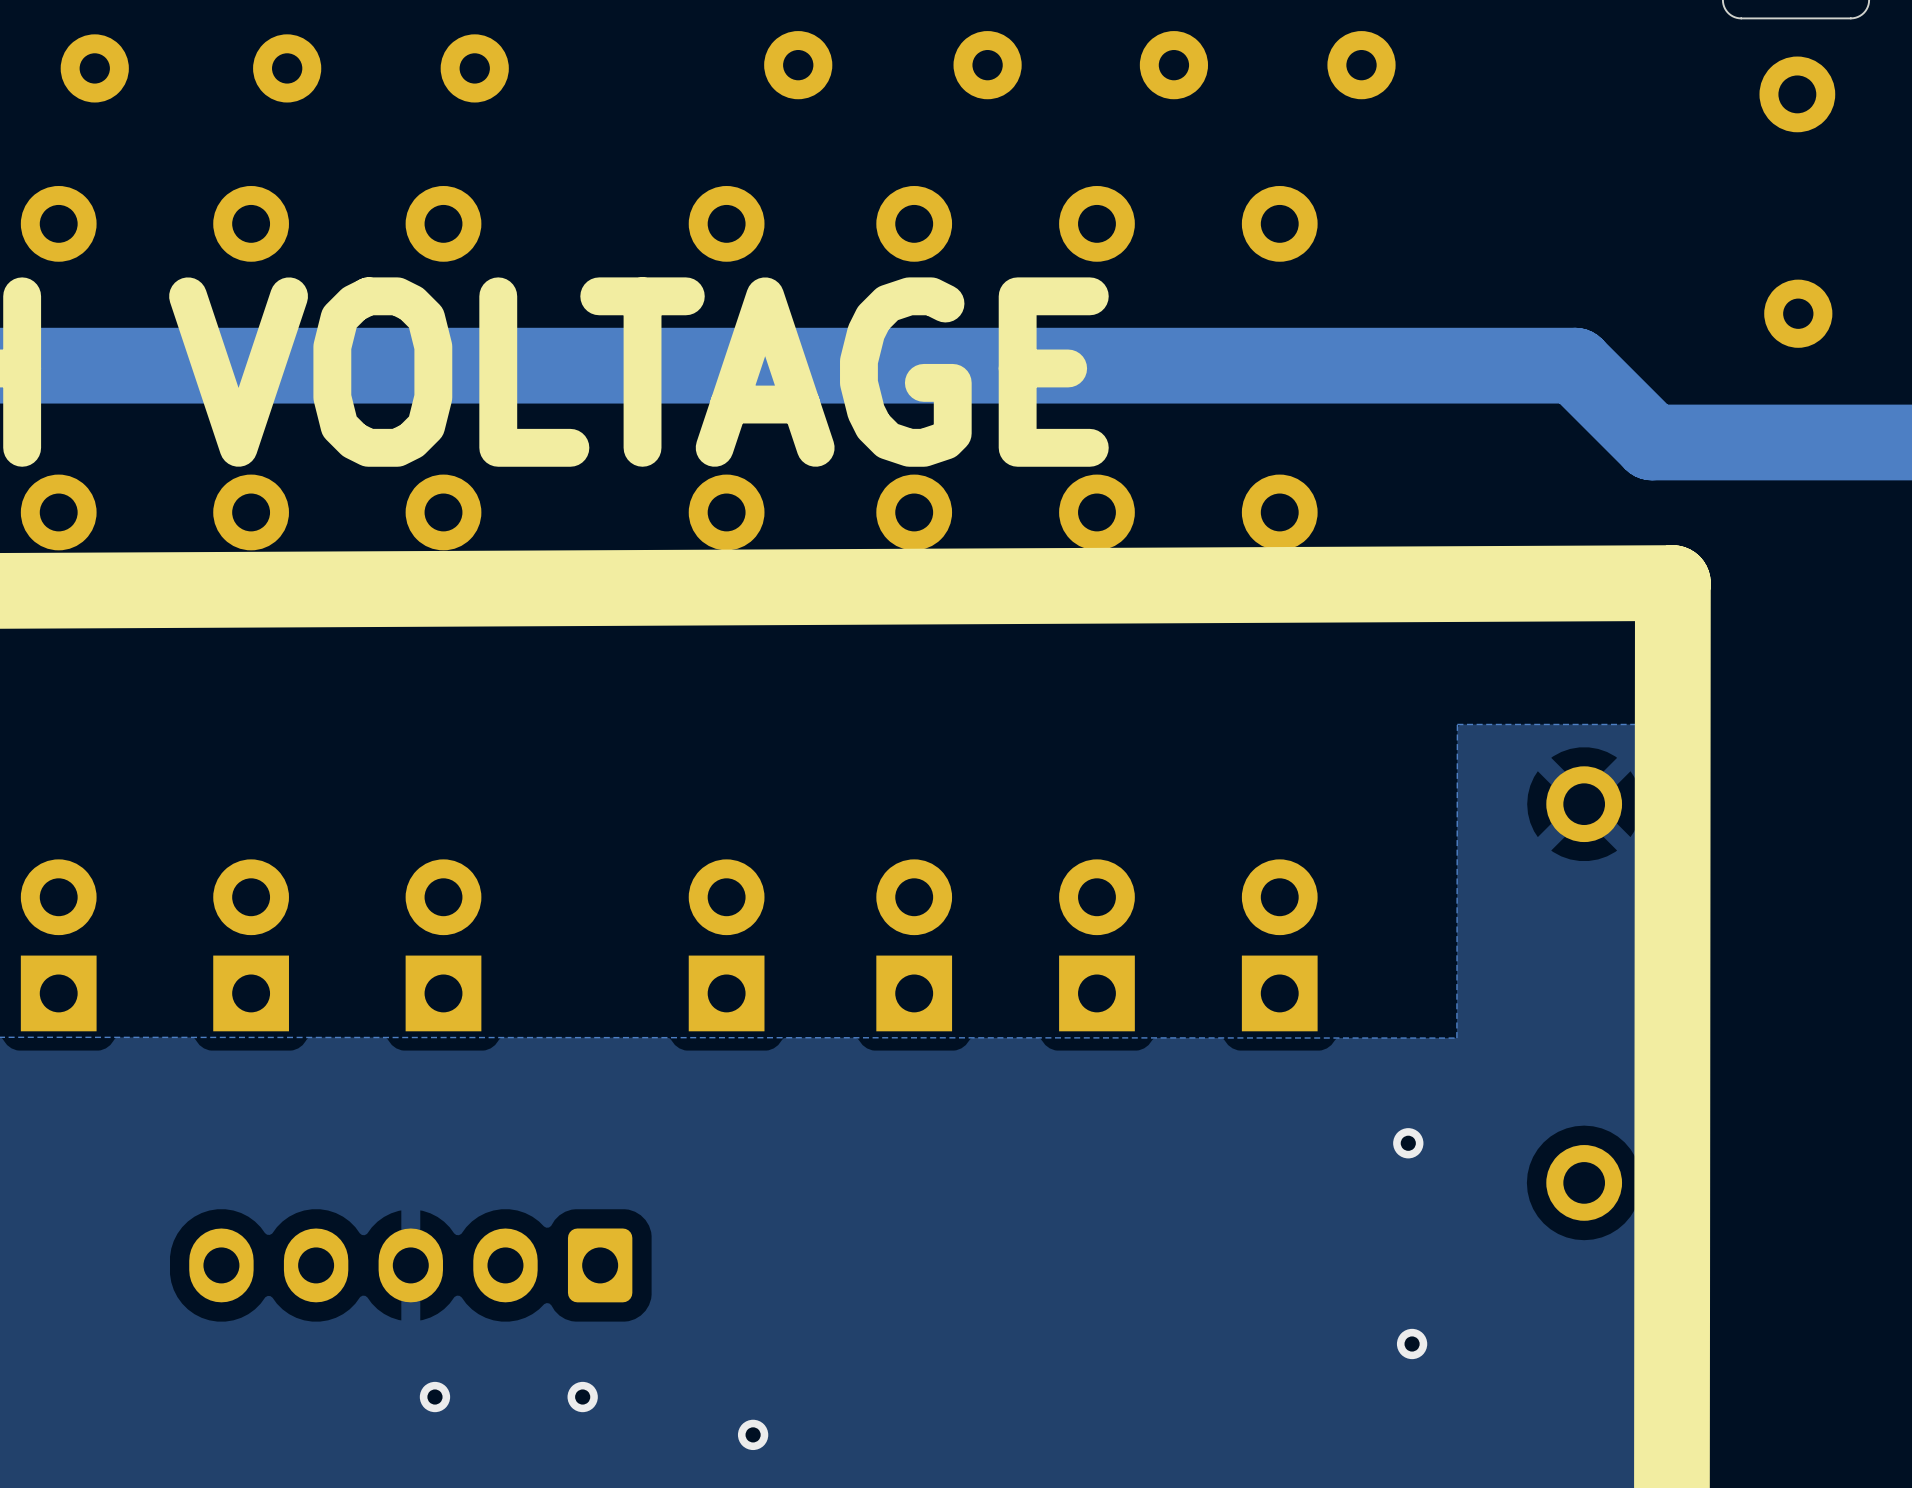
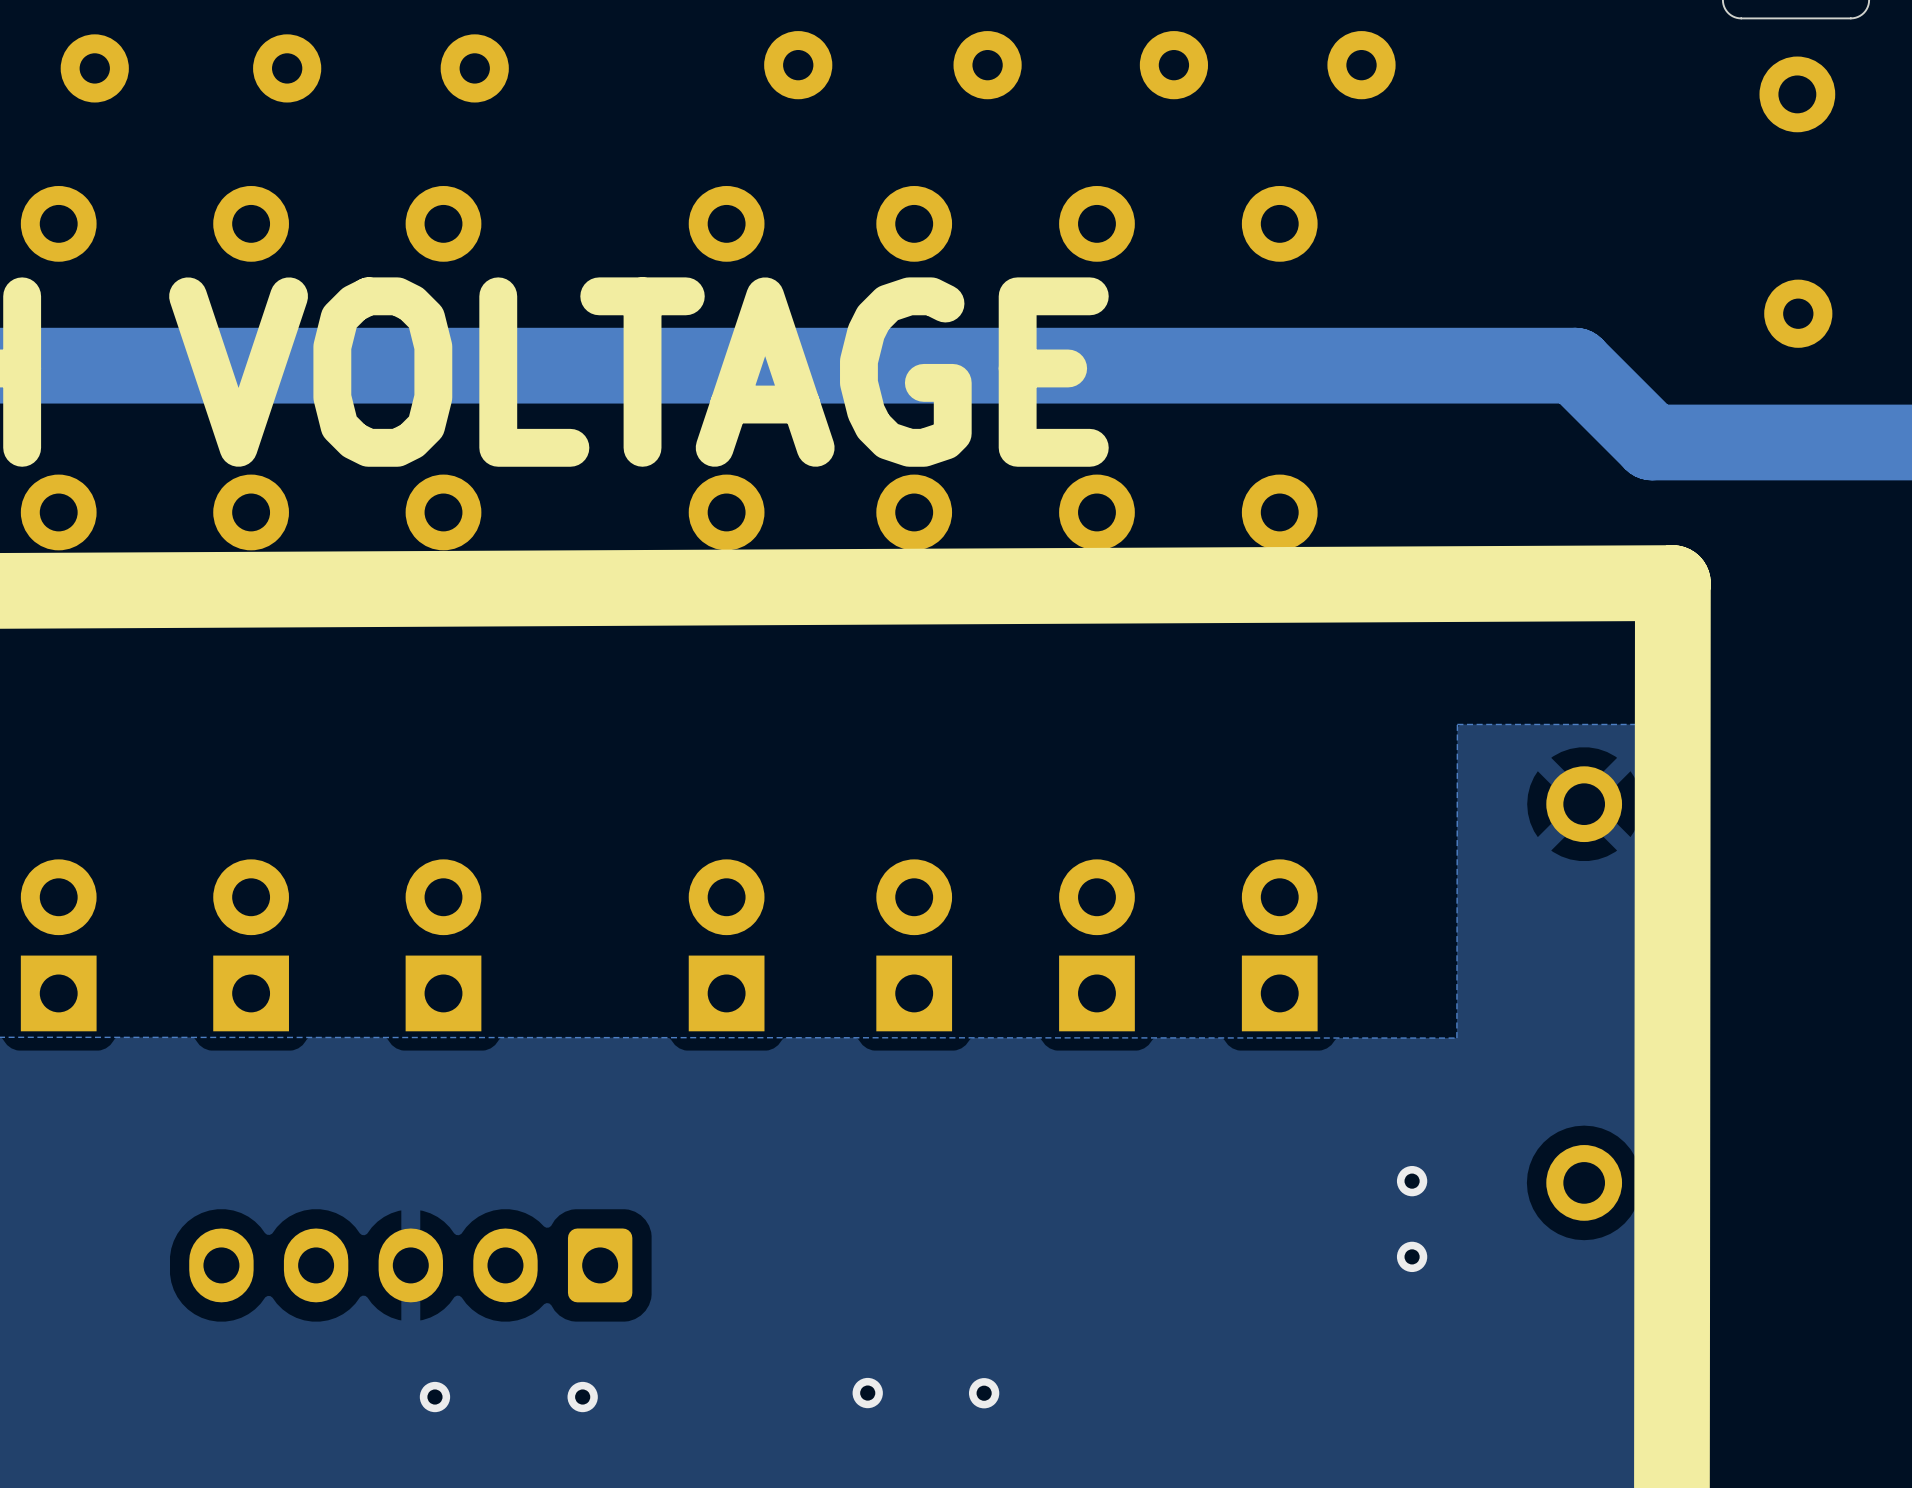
via position: (1408, 1143) -> (1412, 1181)
via: none -> (1412, 1256)
via: (1412, 1343) -> none
via: none -> (867, 1393)
via: none -> (984, 1393)
via: (753, 1434) -> none

